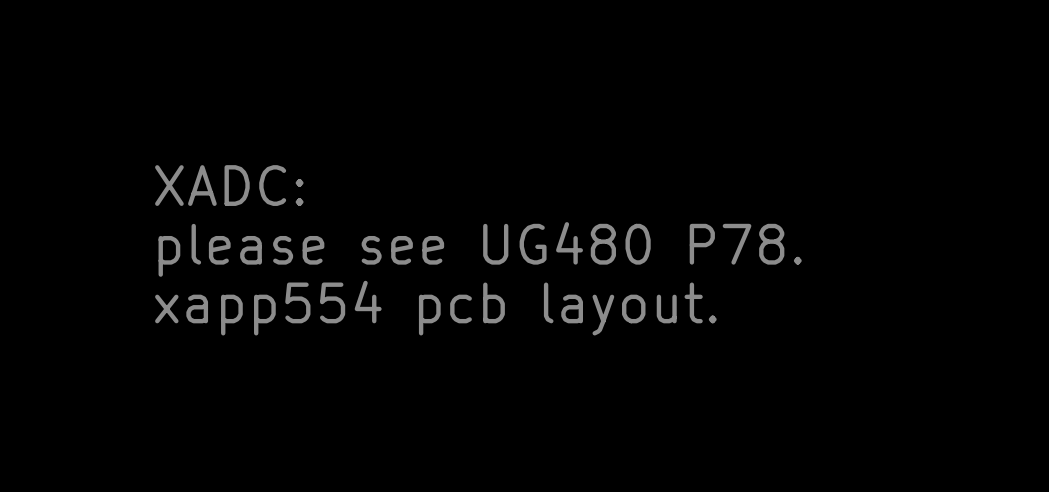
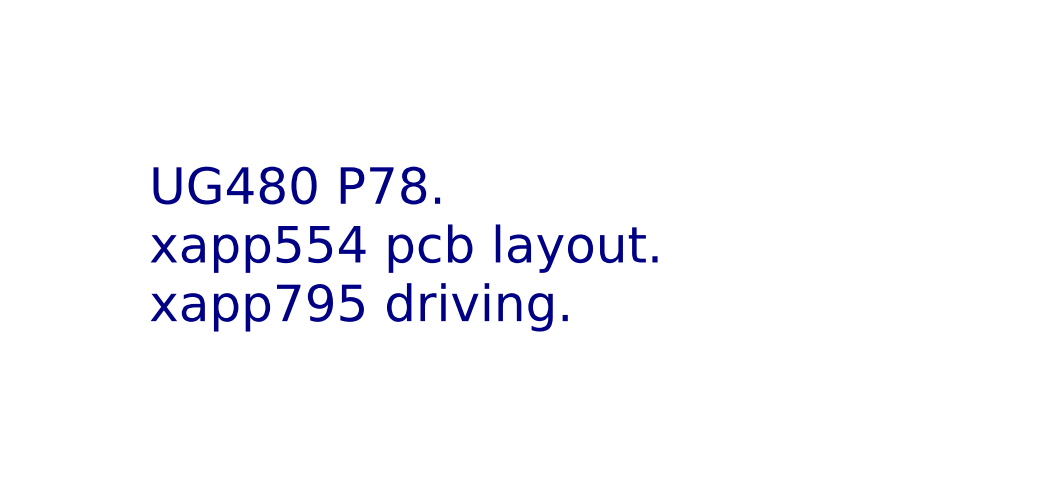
text: XADC: (229, 185) -> UG480 P78. (296, 185)
text: please see UG480 P78. (480, 249) -> xapp554 pcb layout. (404, 248)
text: xapp554 pcb layout. (435, 308) -> xapp795 driving. (359, 307)

